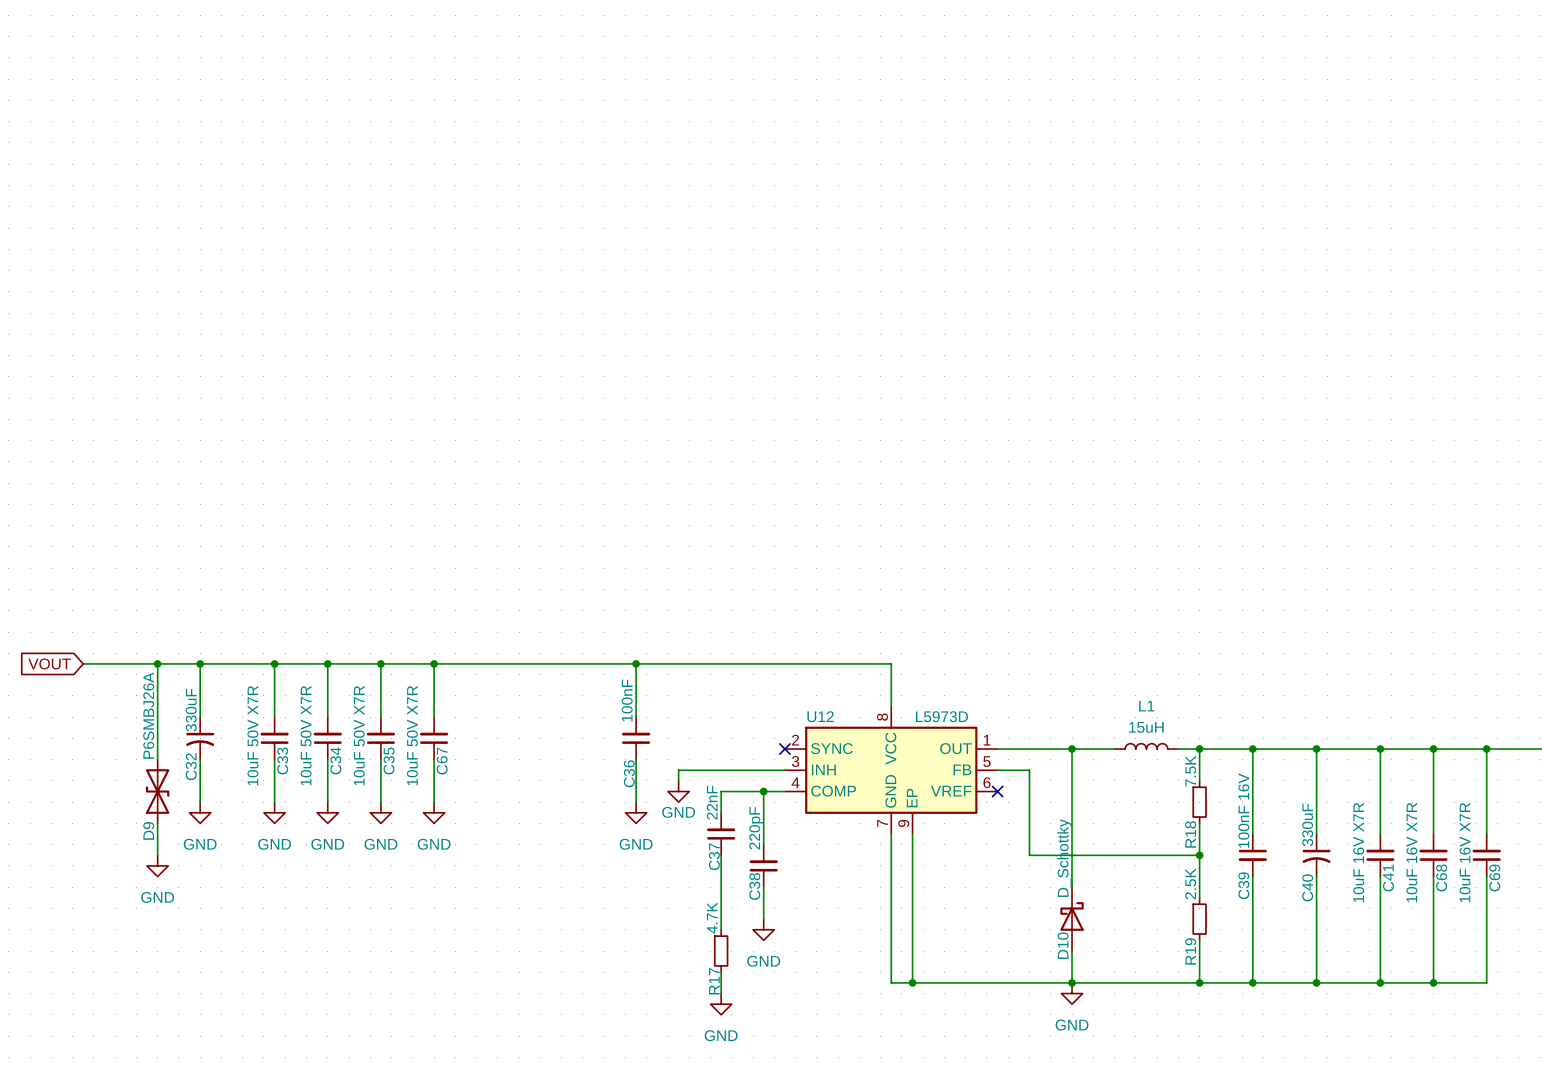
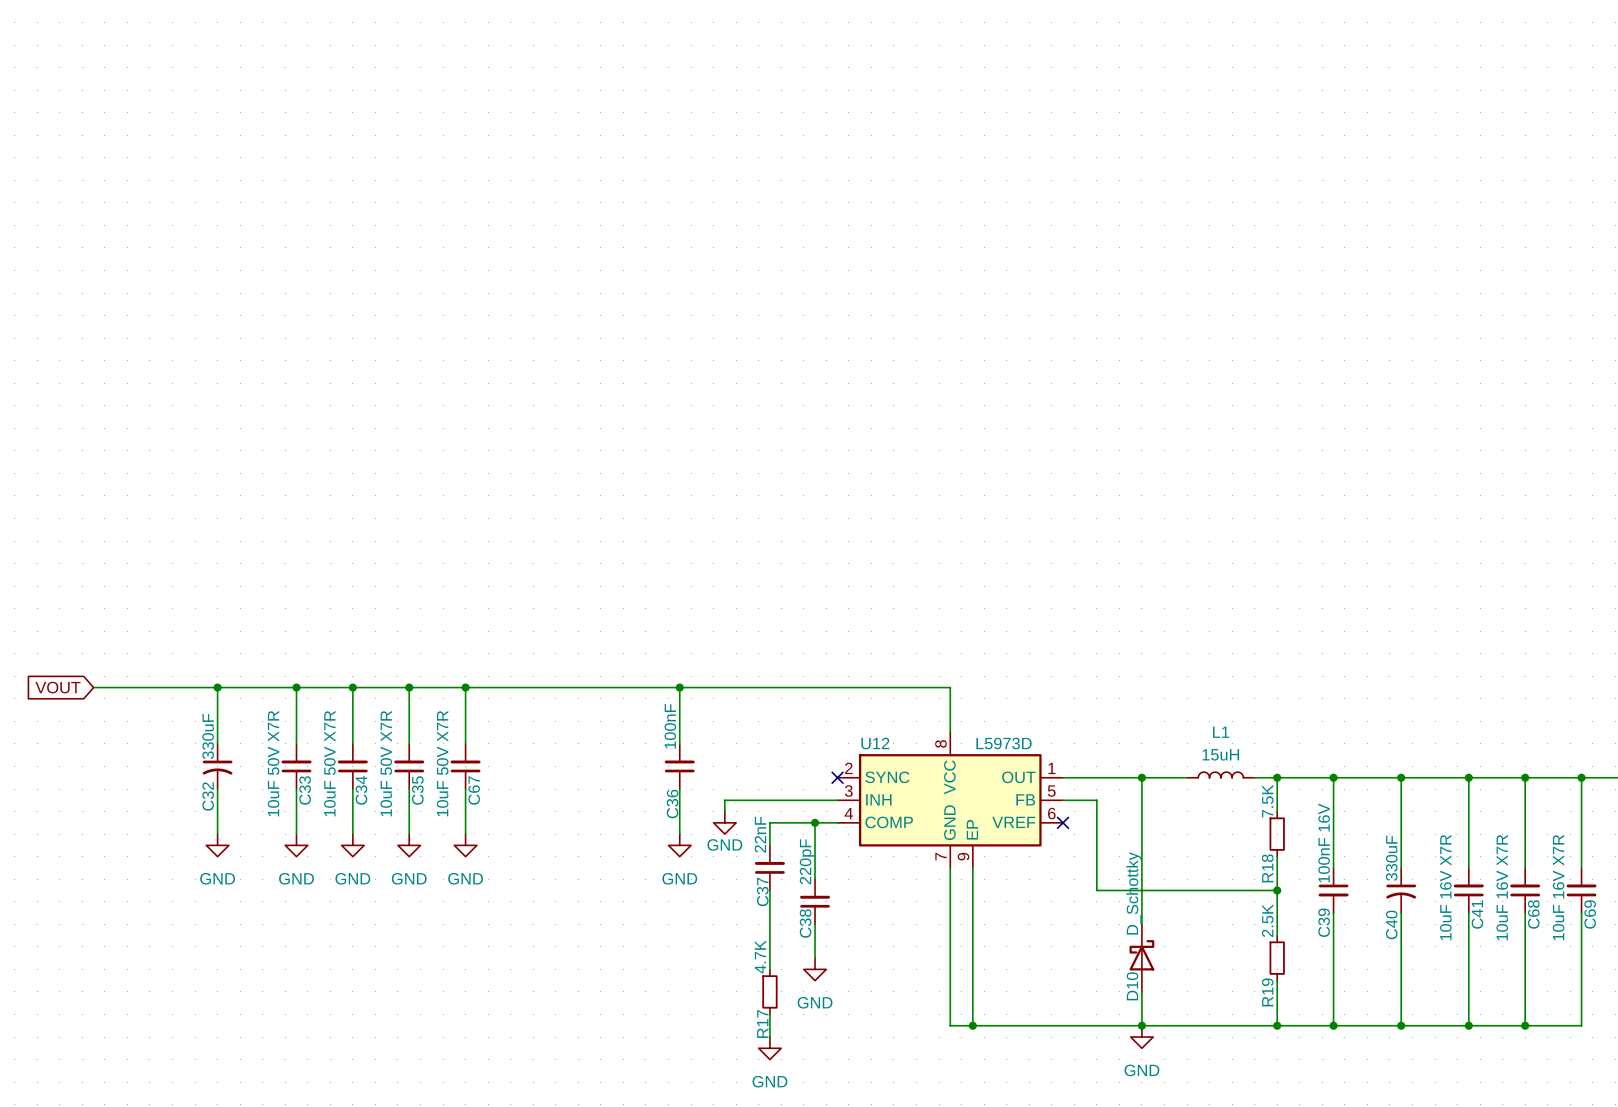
wire: (157, 663) (157, 759) -> none
junction: (157, 663) -> none
D9: P6SMBJ26A (157, 791) -> none
wire: (157, 823) (157, 855) -> none
power symbol: GND (157, 865) -> none

